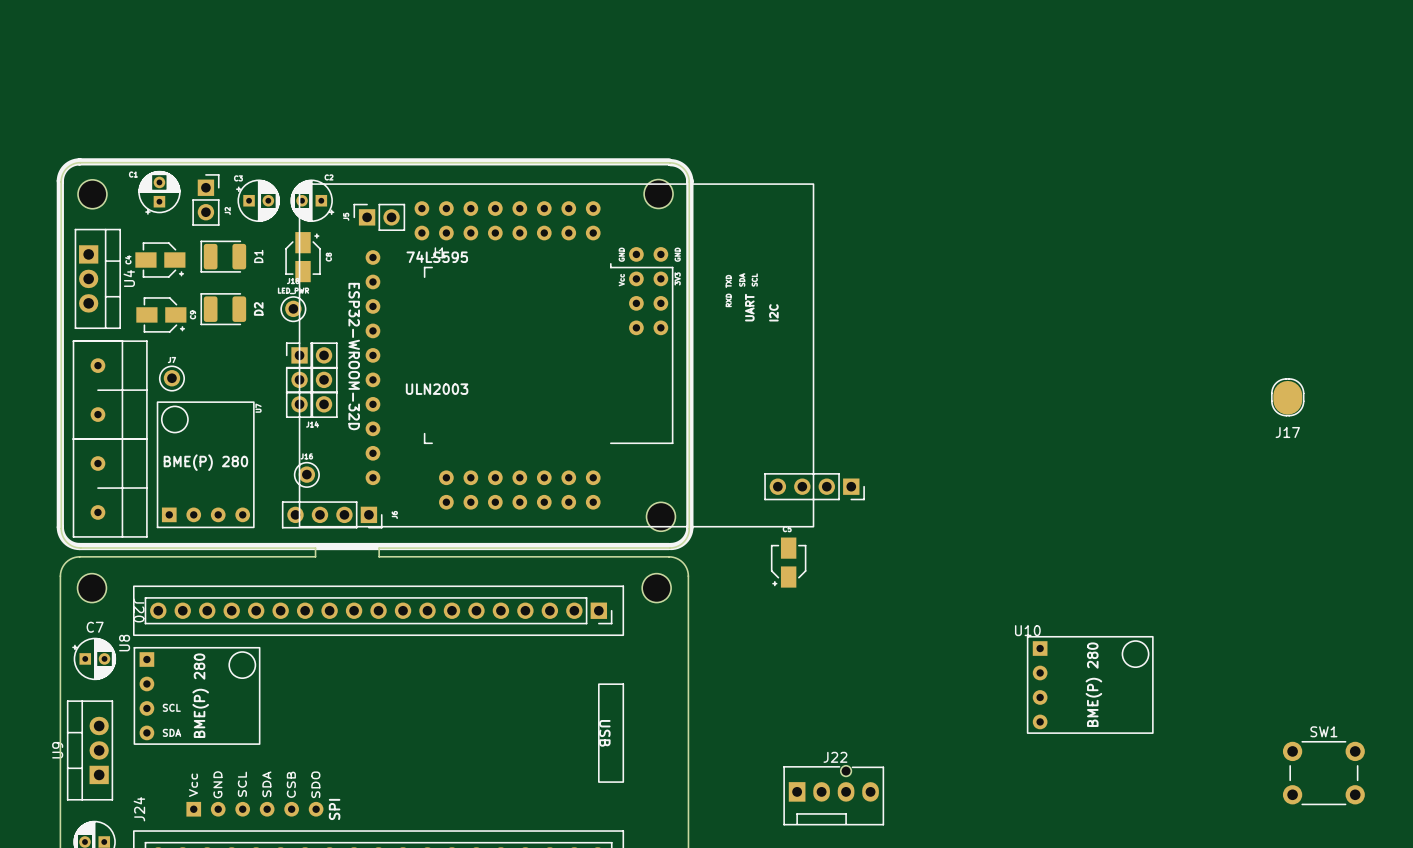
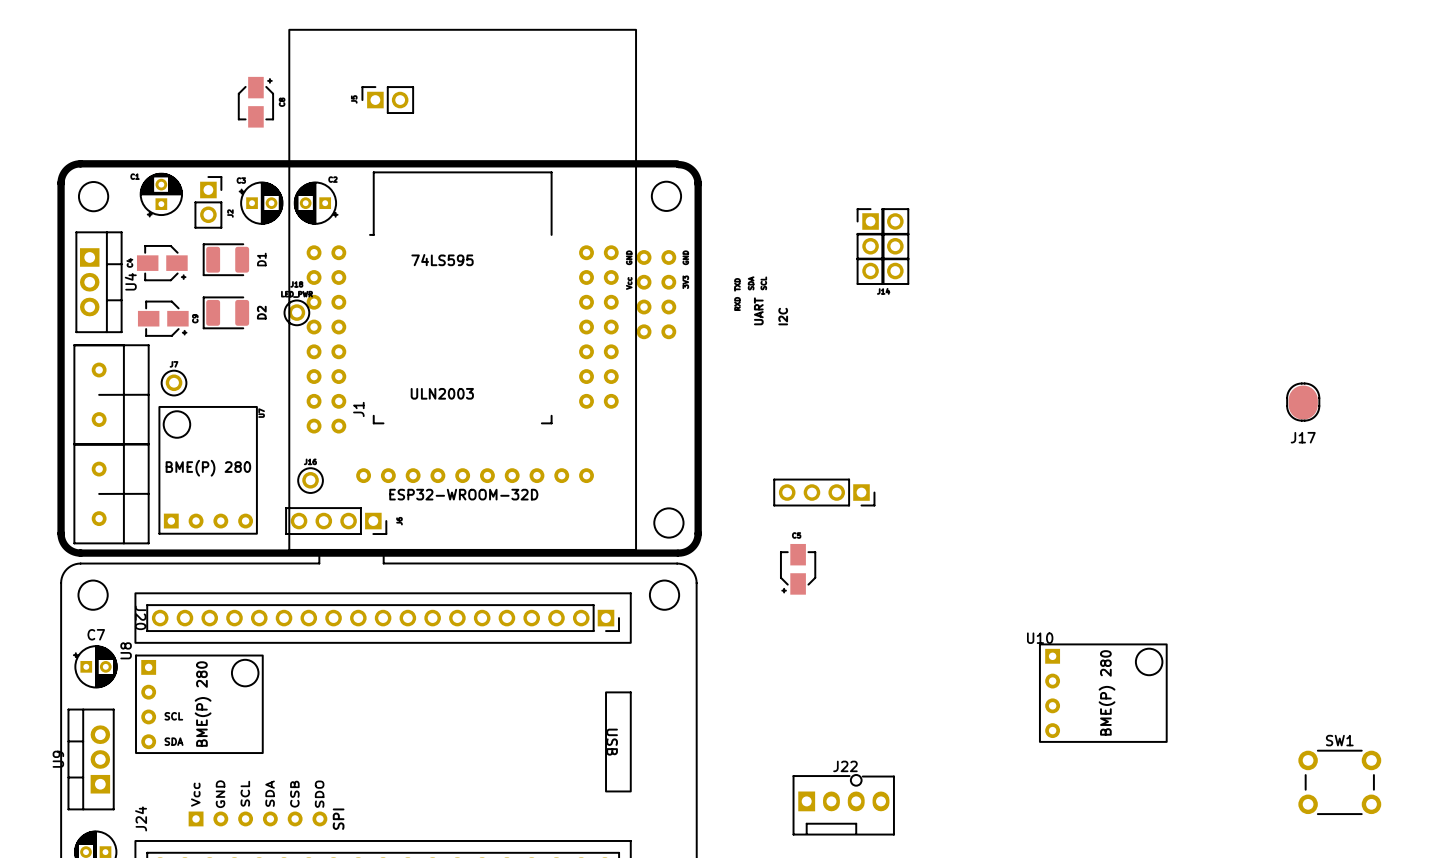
part position: (379, 217) -> (387, 100)
part position: (303, 257) -> (255, 102)
J1 rotation: 0° (556, 355) -> 90° counterclockwise (462, 289)
part position: (311, 380) -> (882, 246)

